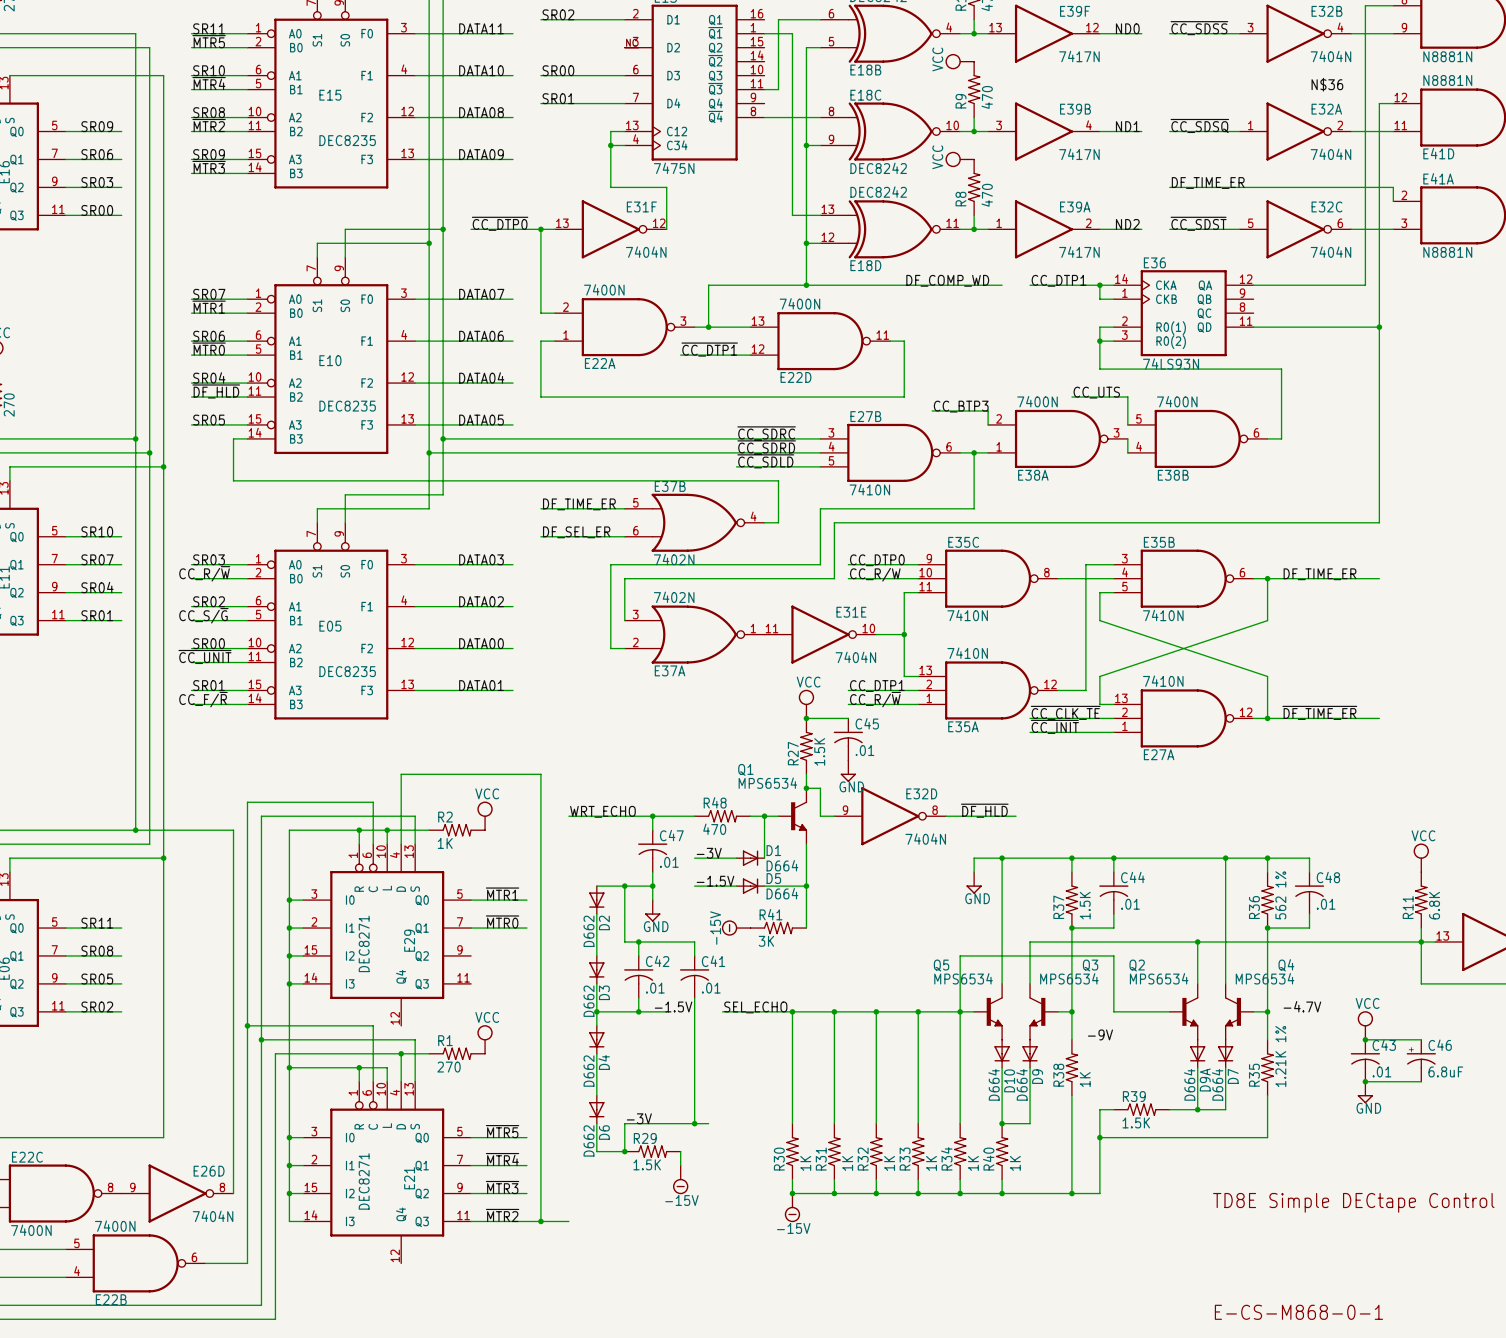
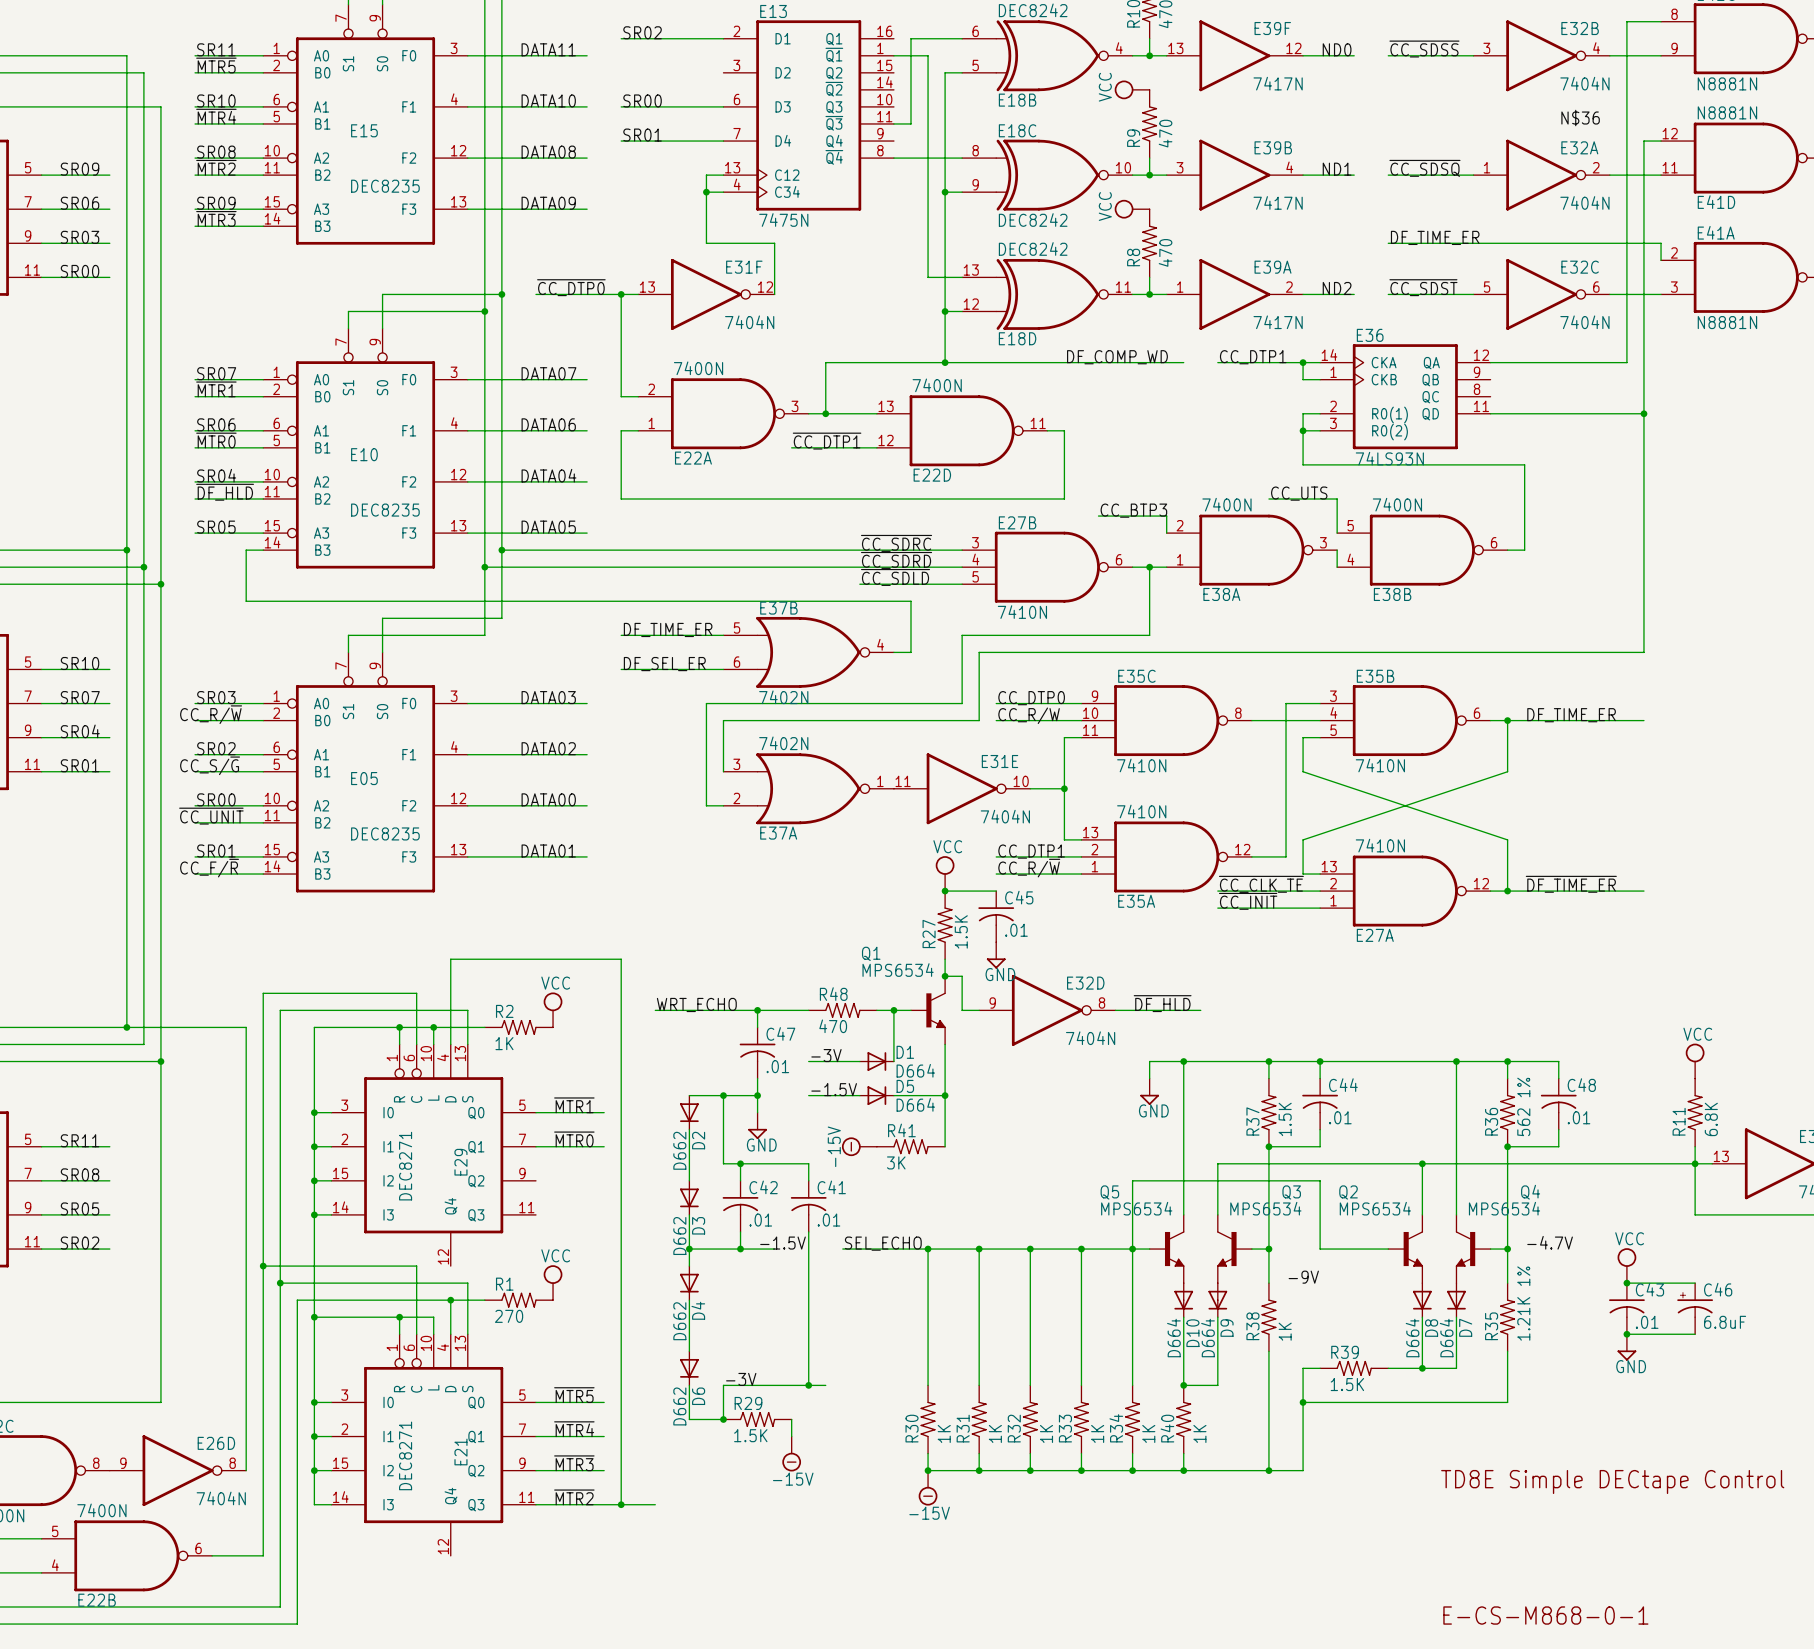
power symbol: (631, 47) -> none
D9A name: D9A (1205, 1080) -> D8 (1431, 1328)

